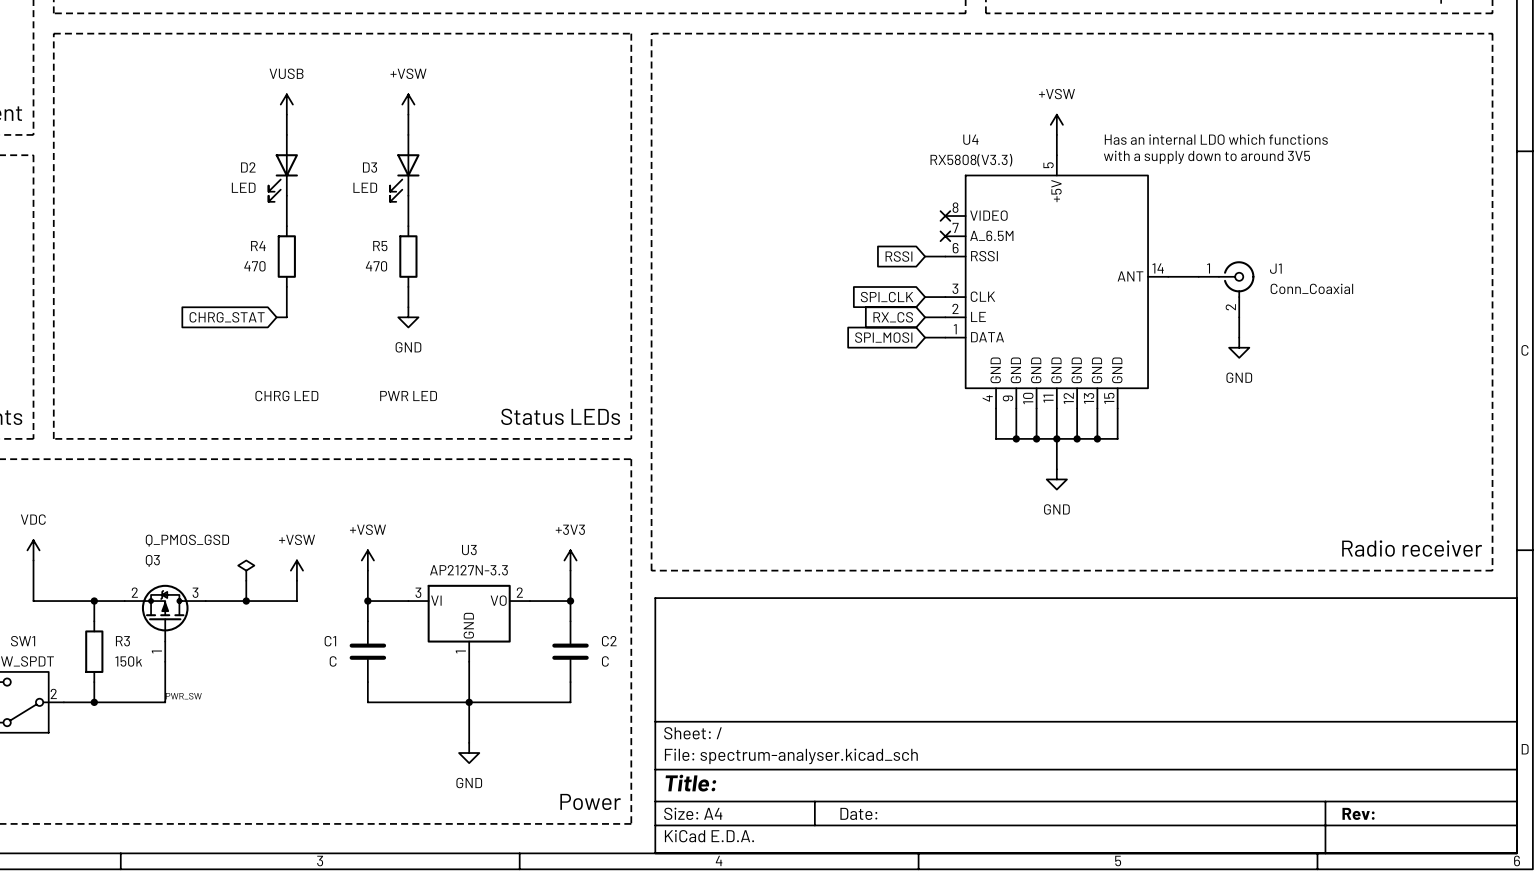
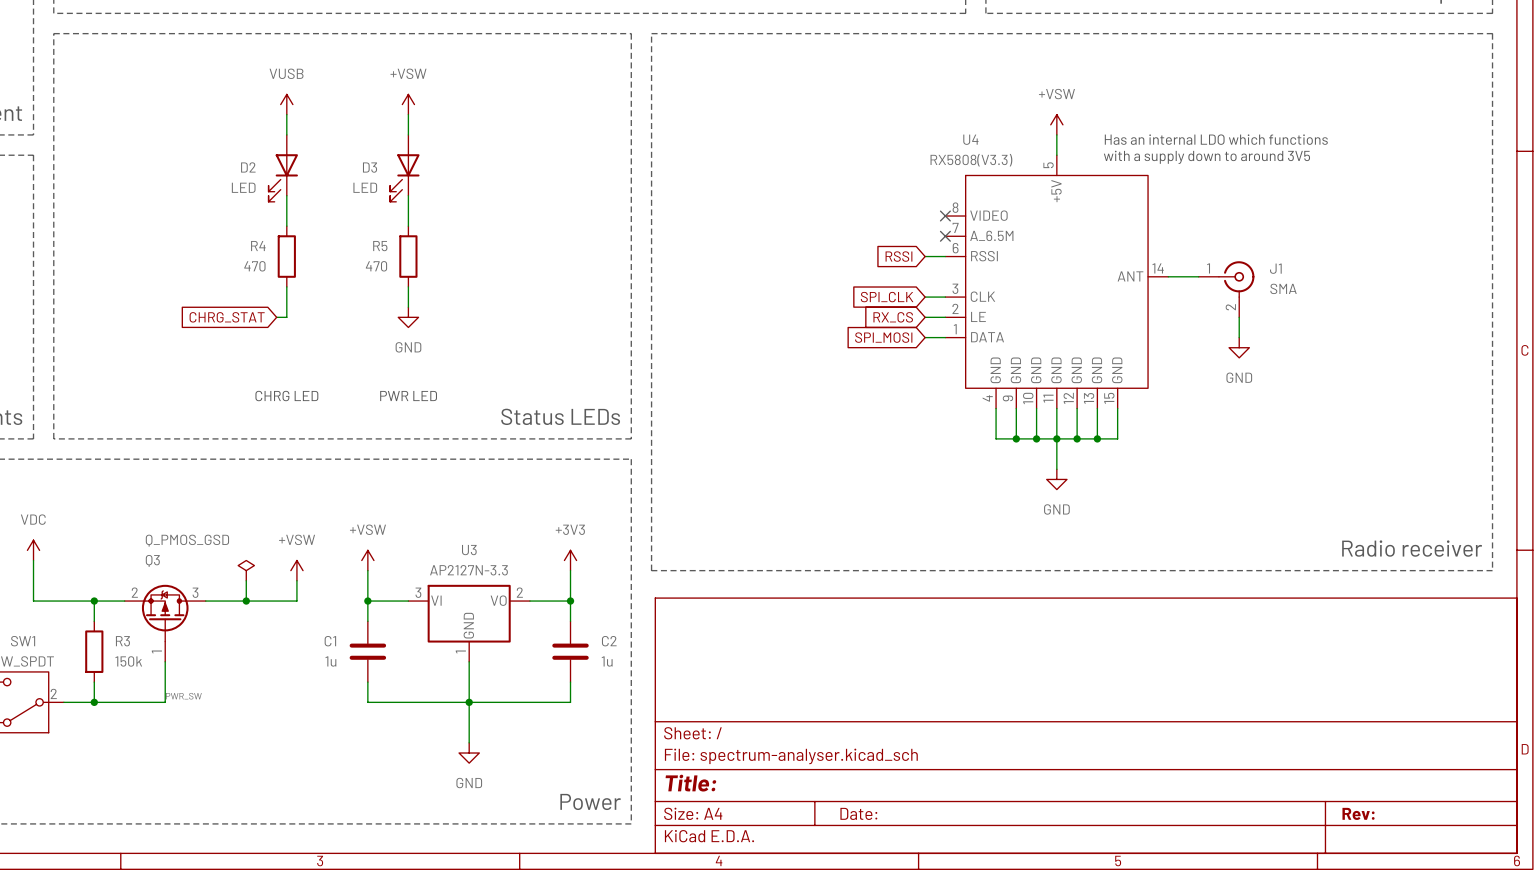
J1 value: Conn_Coaxial (1311, 288) -> SMA (1283, 288)
C1 value: C (333, 661) -> 1u (330, 661)
C2 value: C (605, 661) -> 1u (607, 661)

